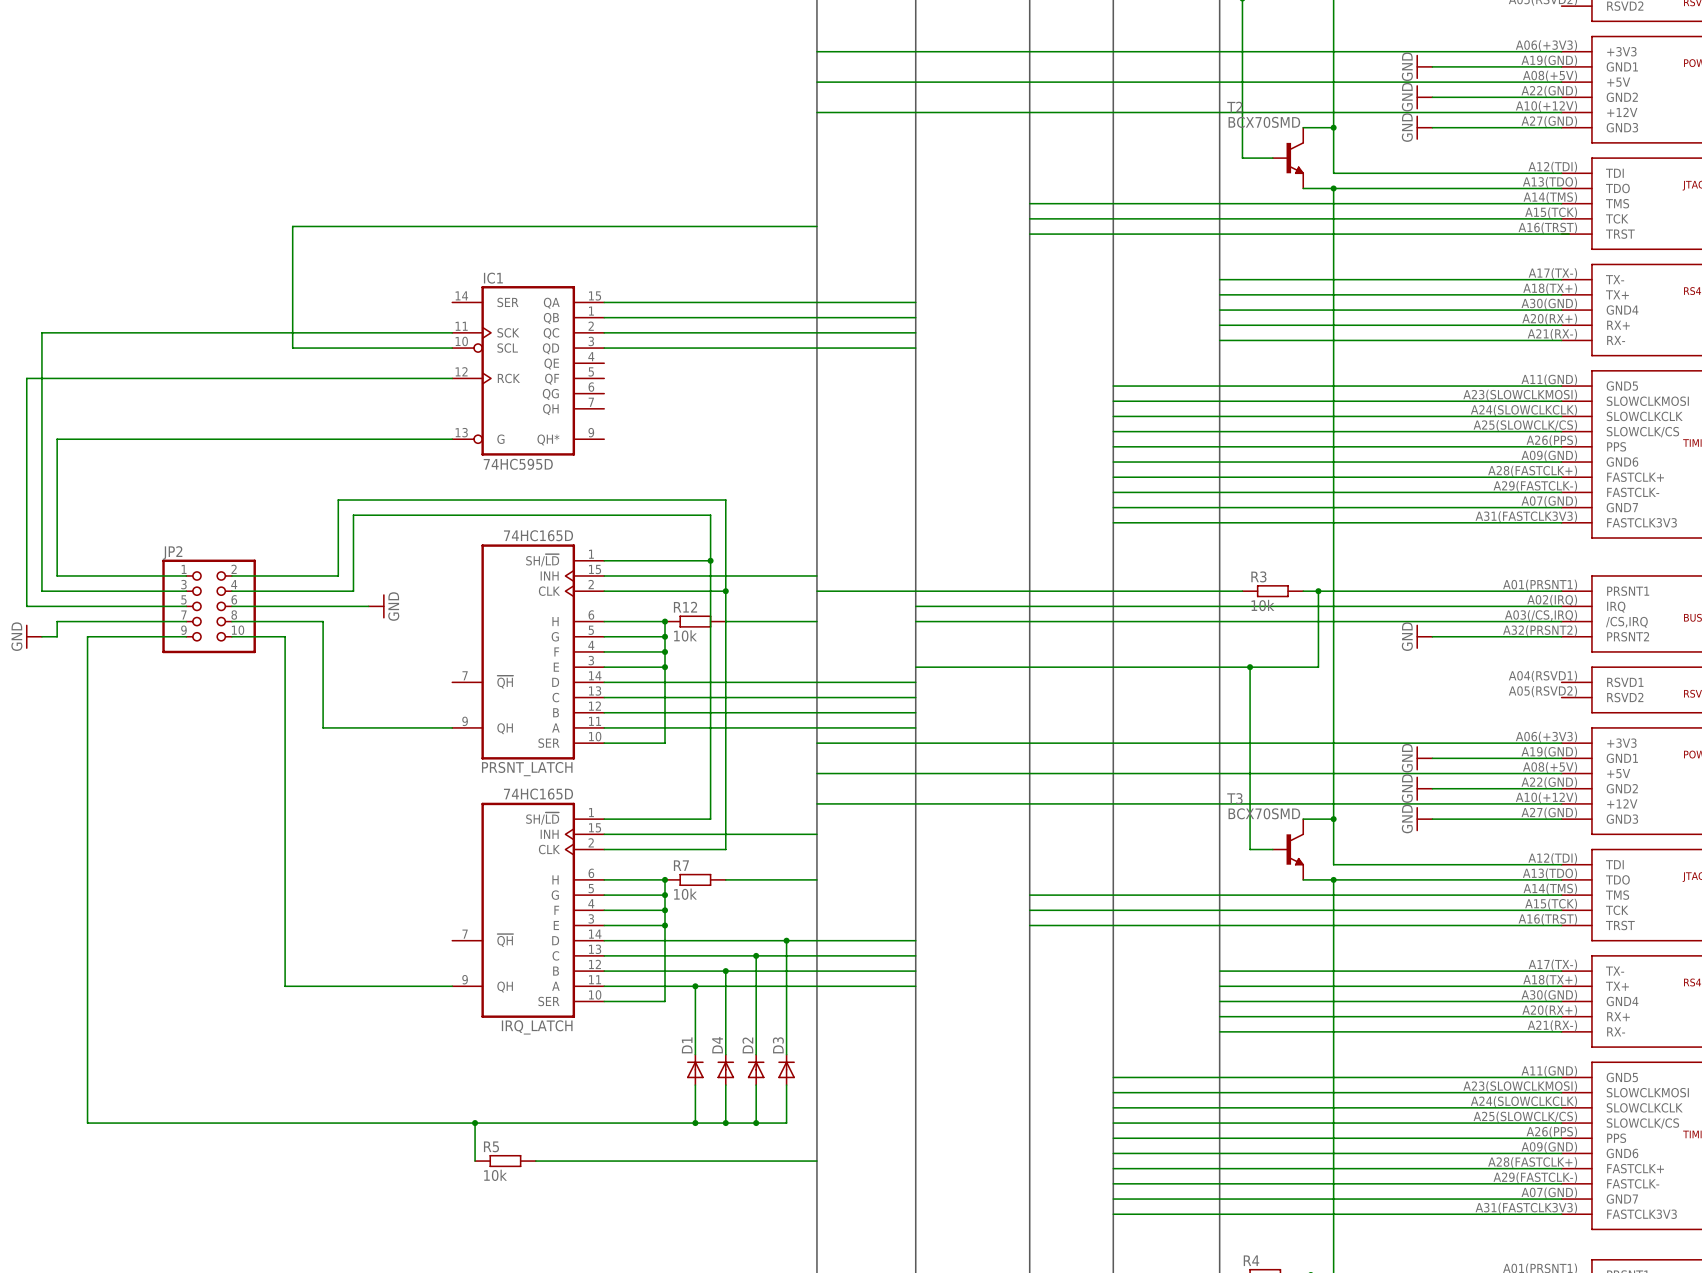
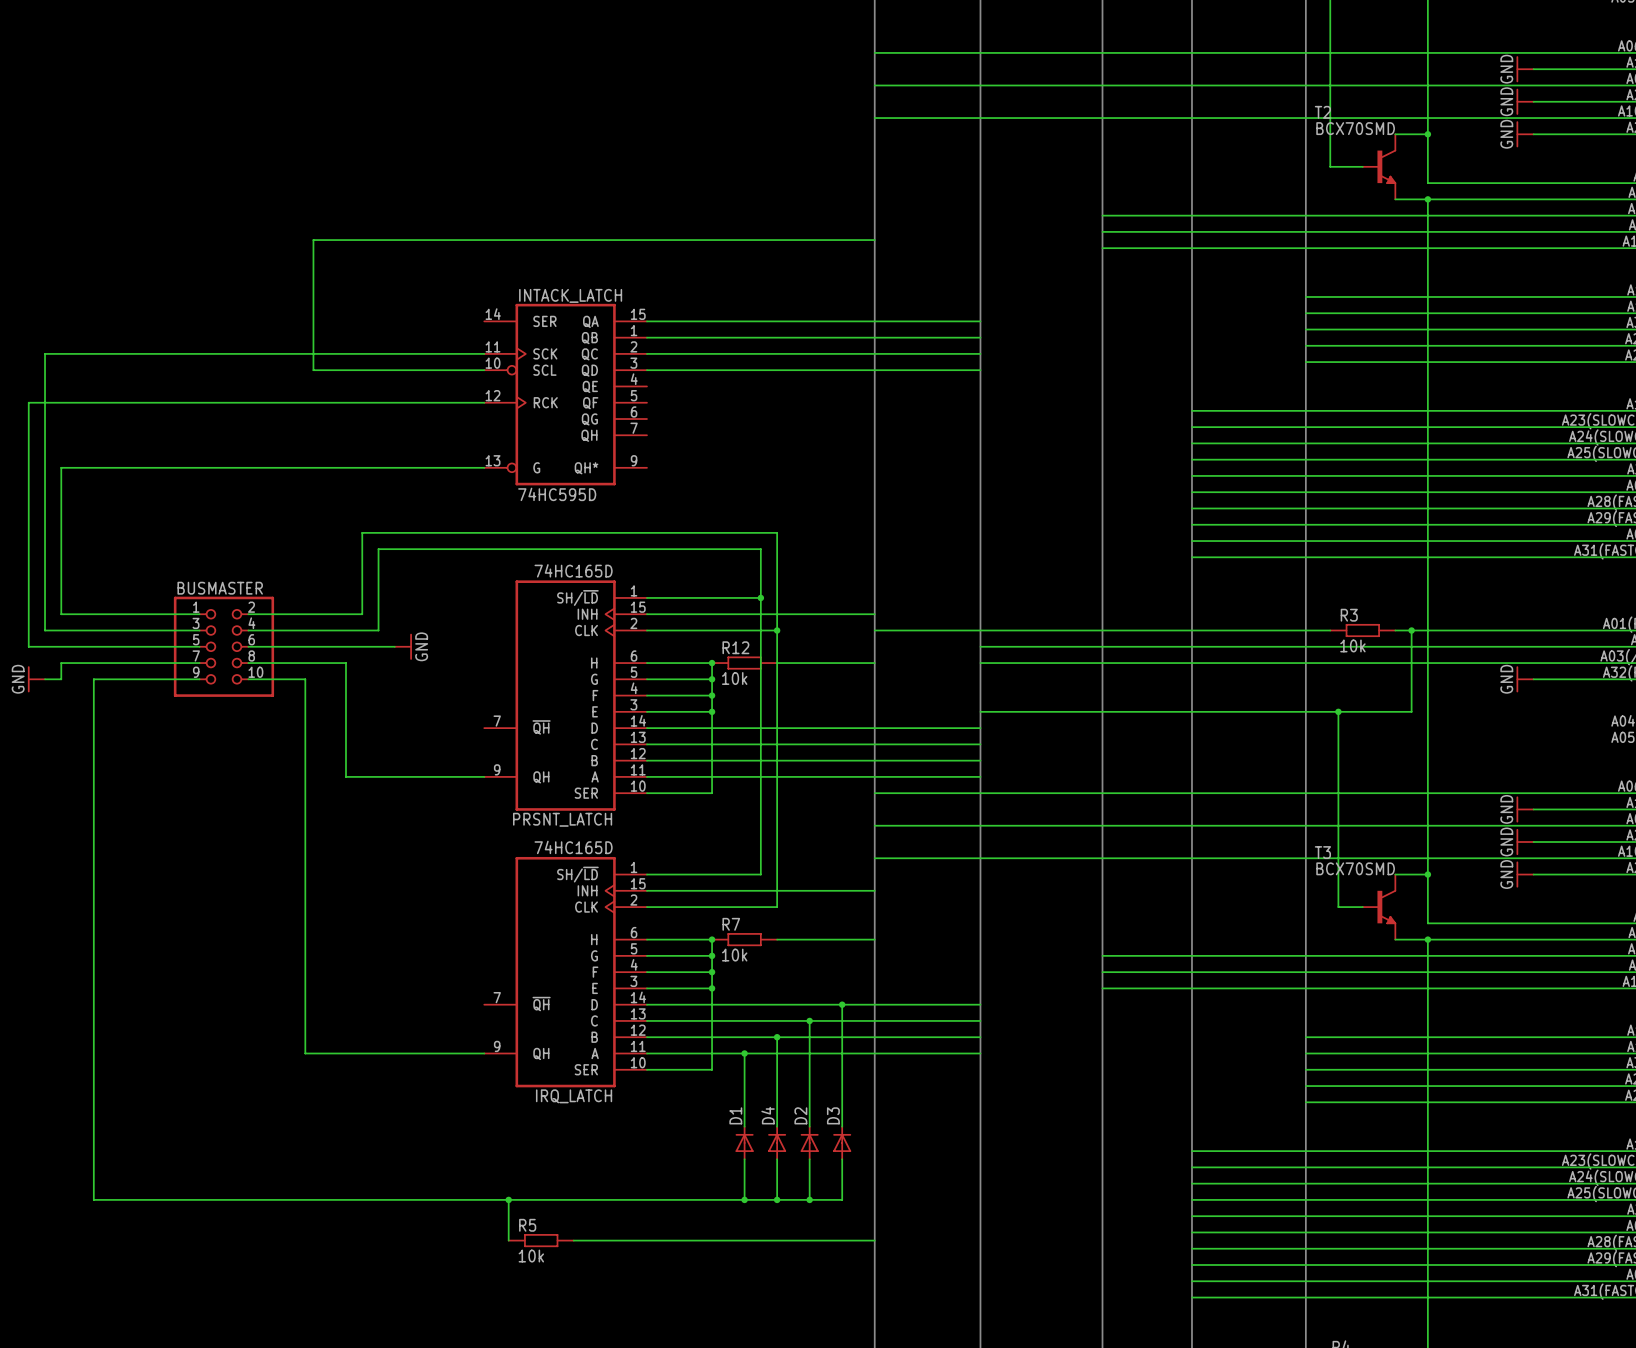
IC1 name: IC1 (493, 278) -> INTACK_LATCH (570, 295)
JP2 name: JP2 (172, 553) -> BUSMASTER (220, 588)

